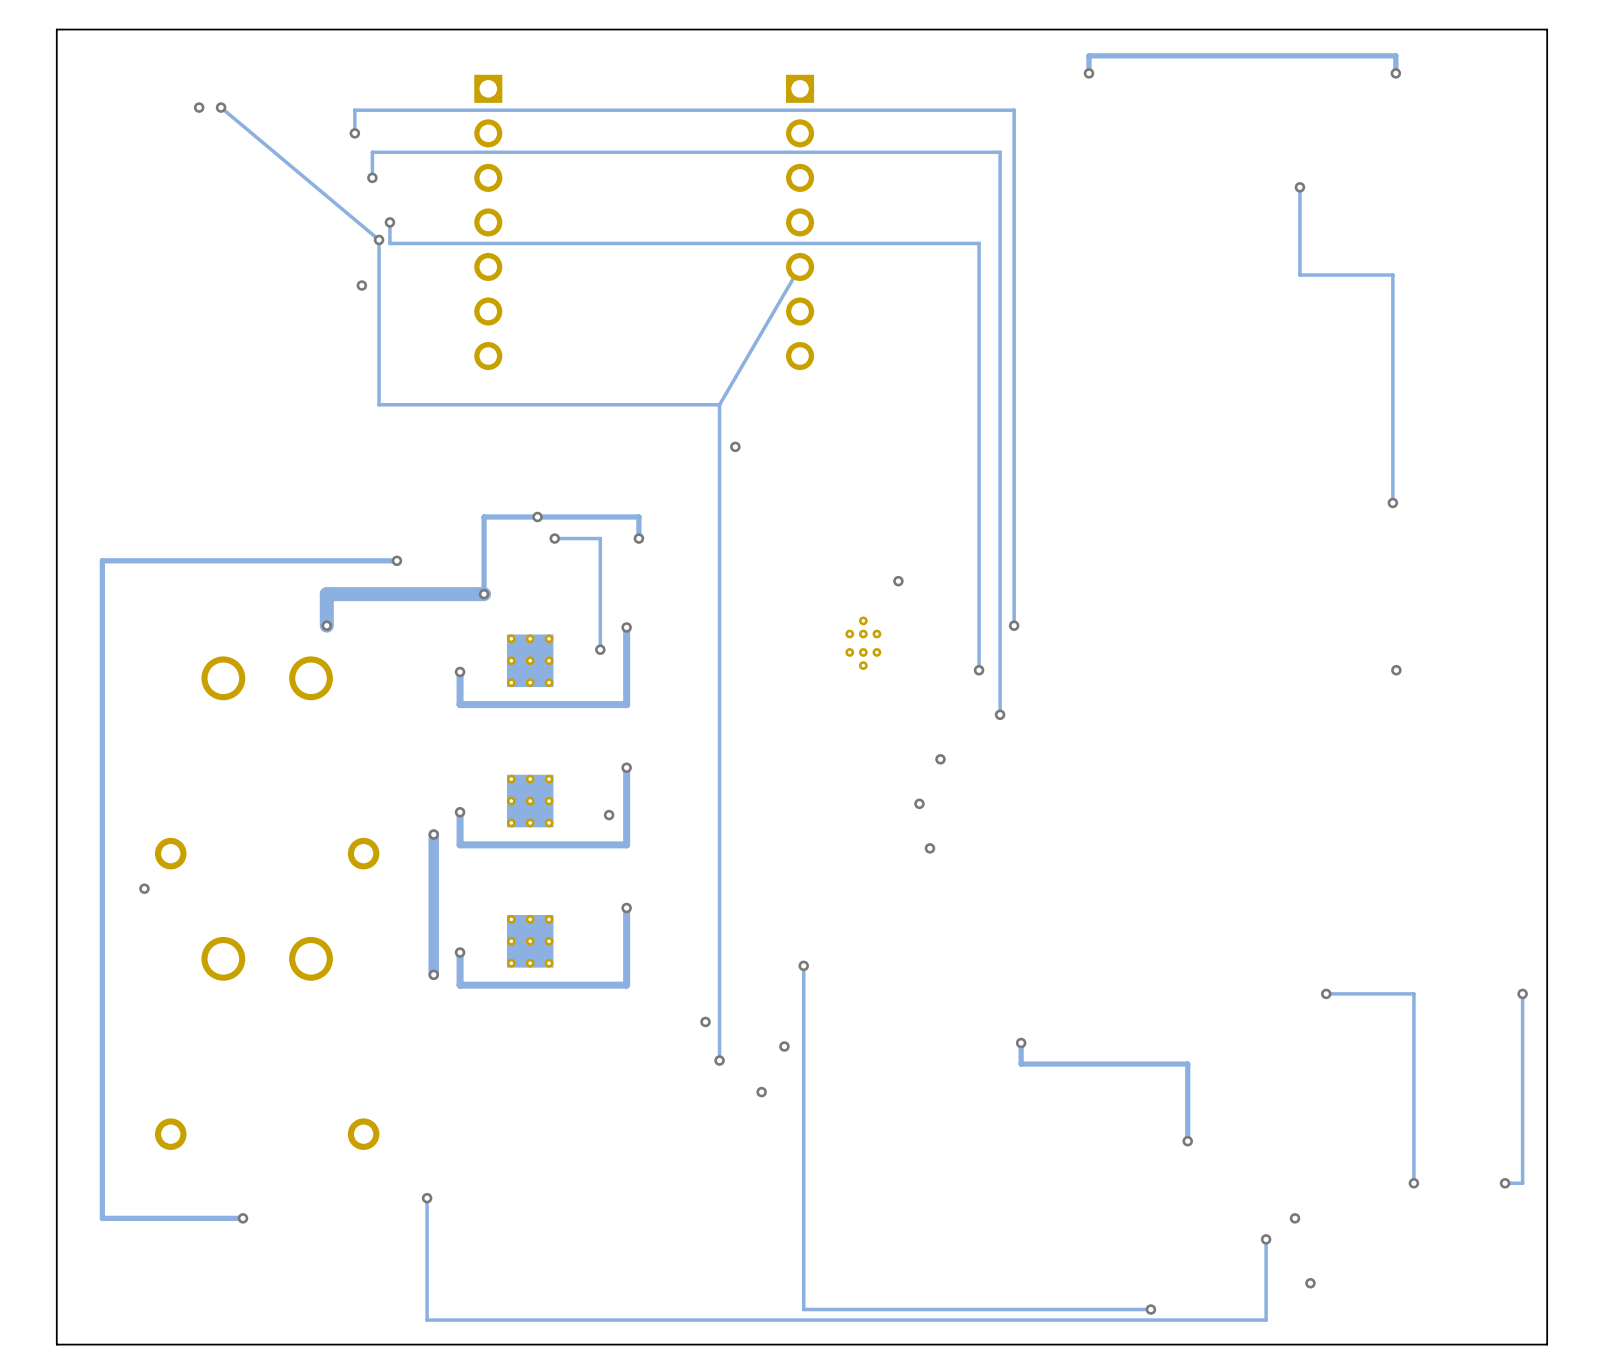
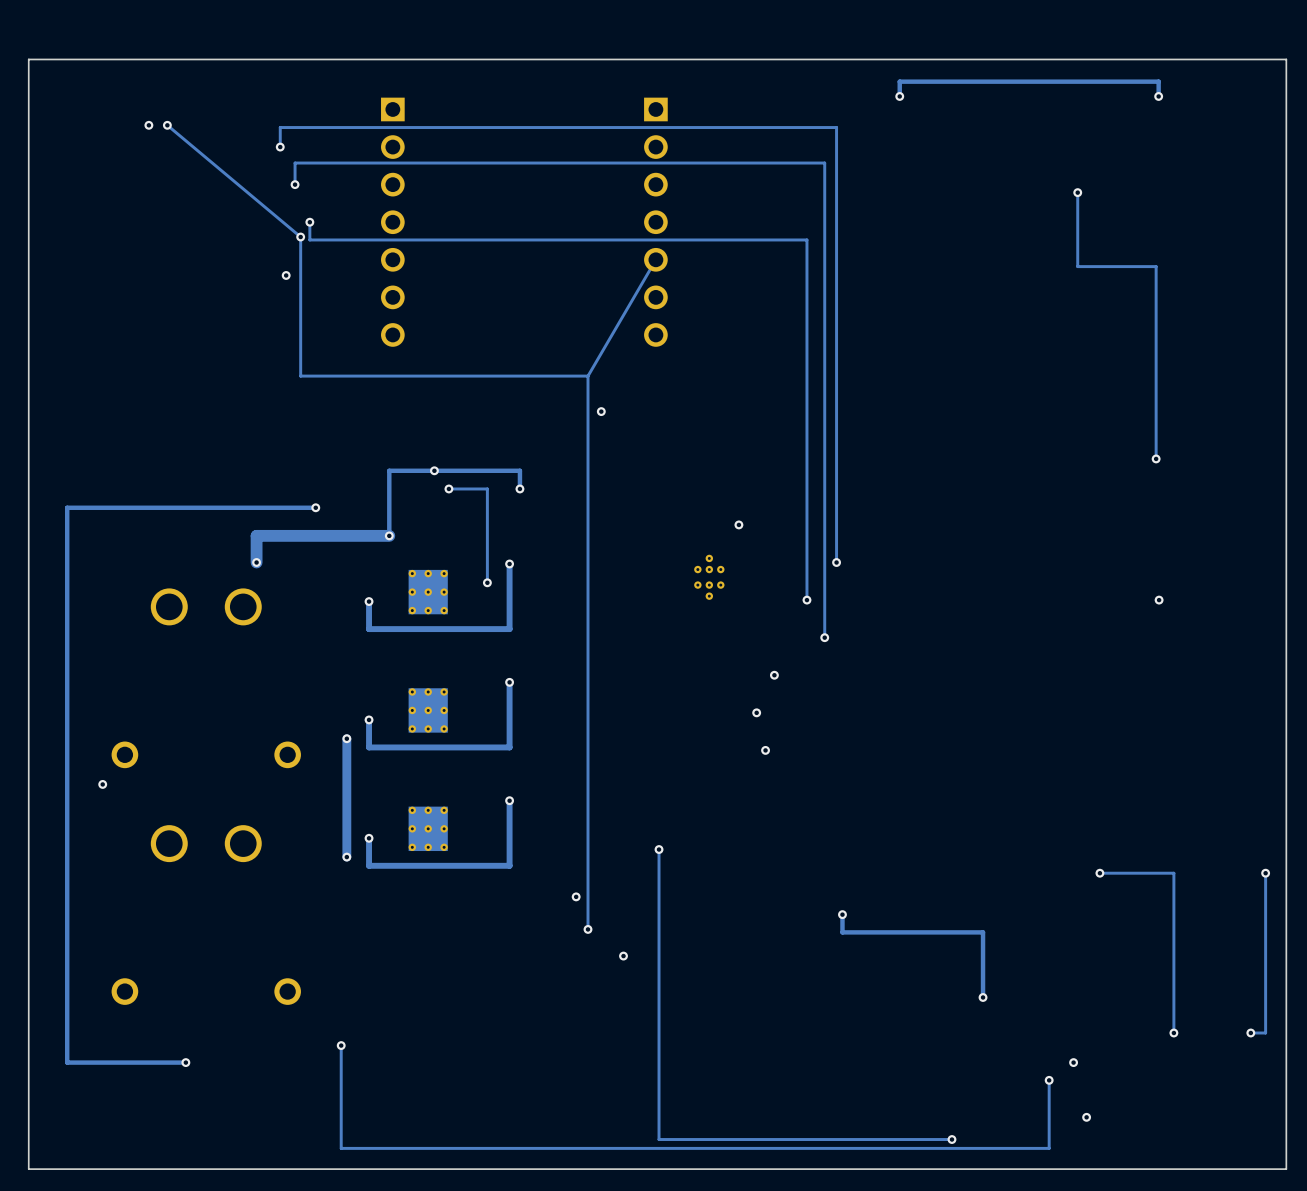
via: (609, 815) -> none
via: (784, 1046) -> none

